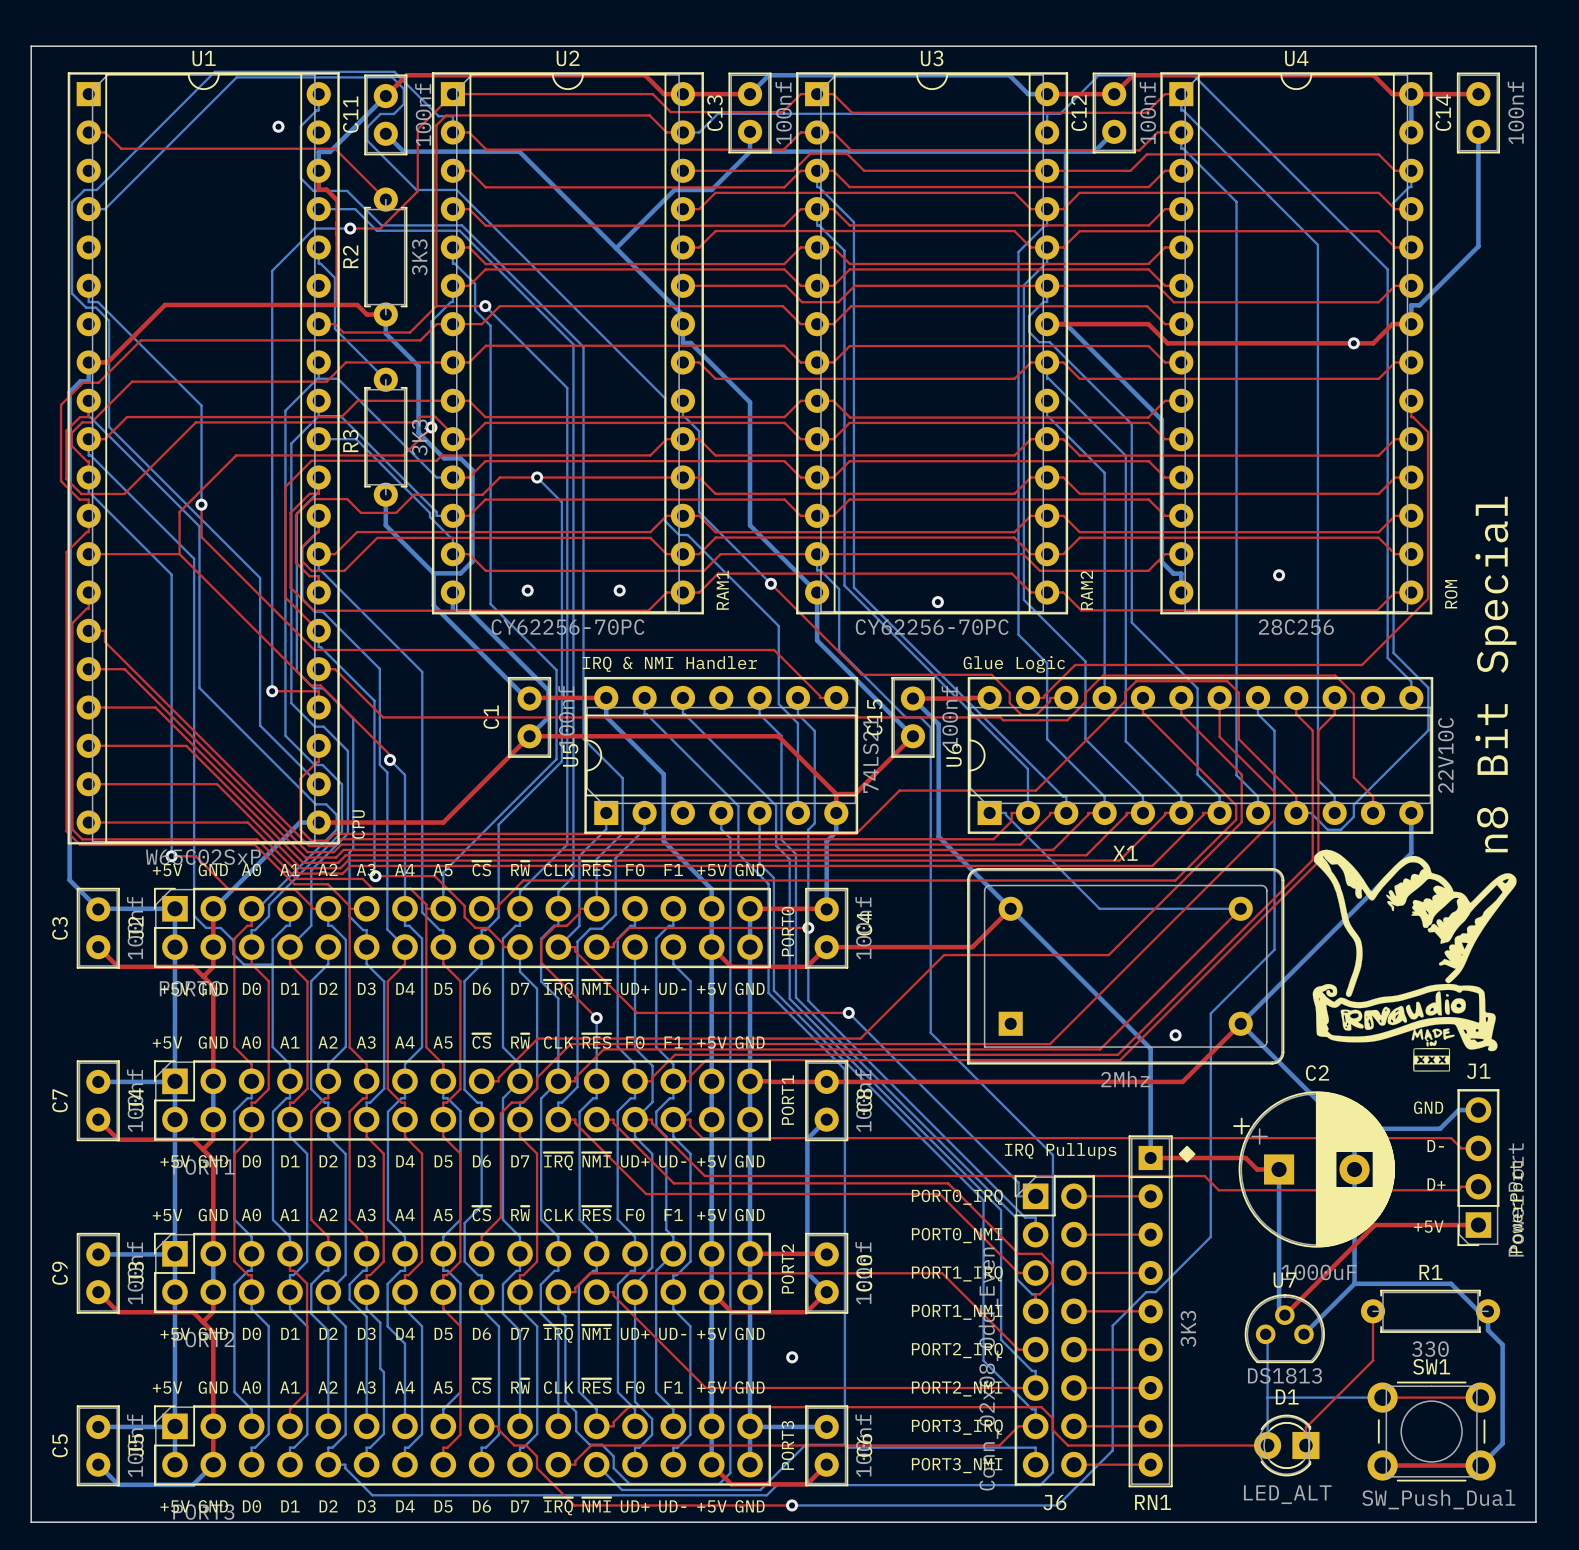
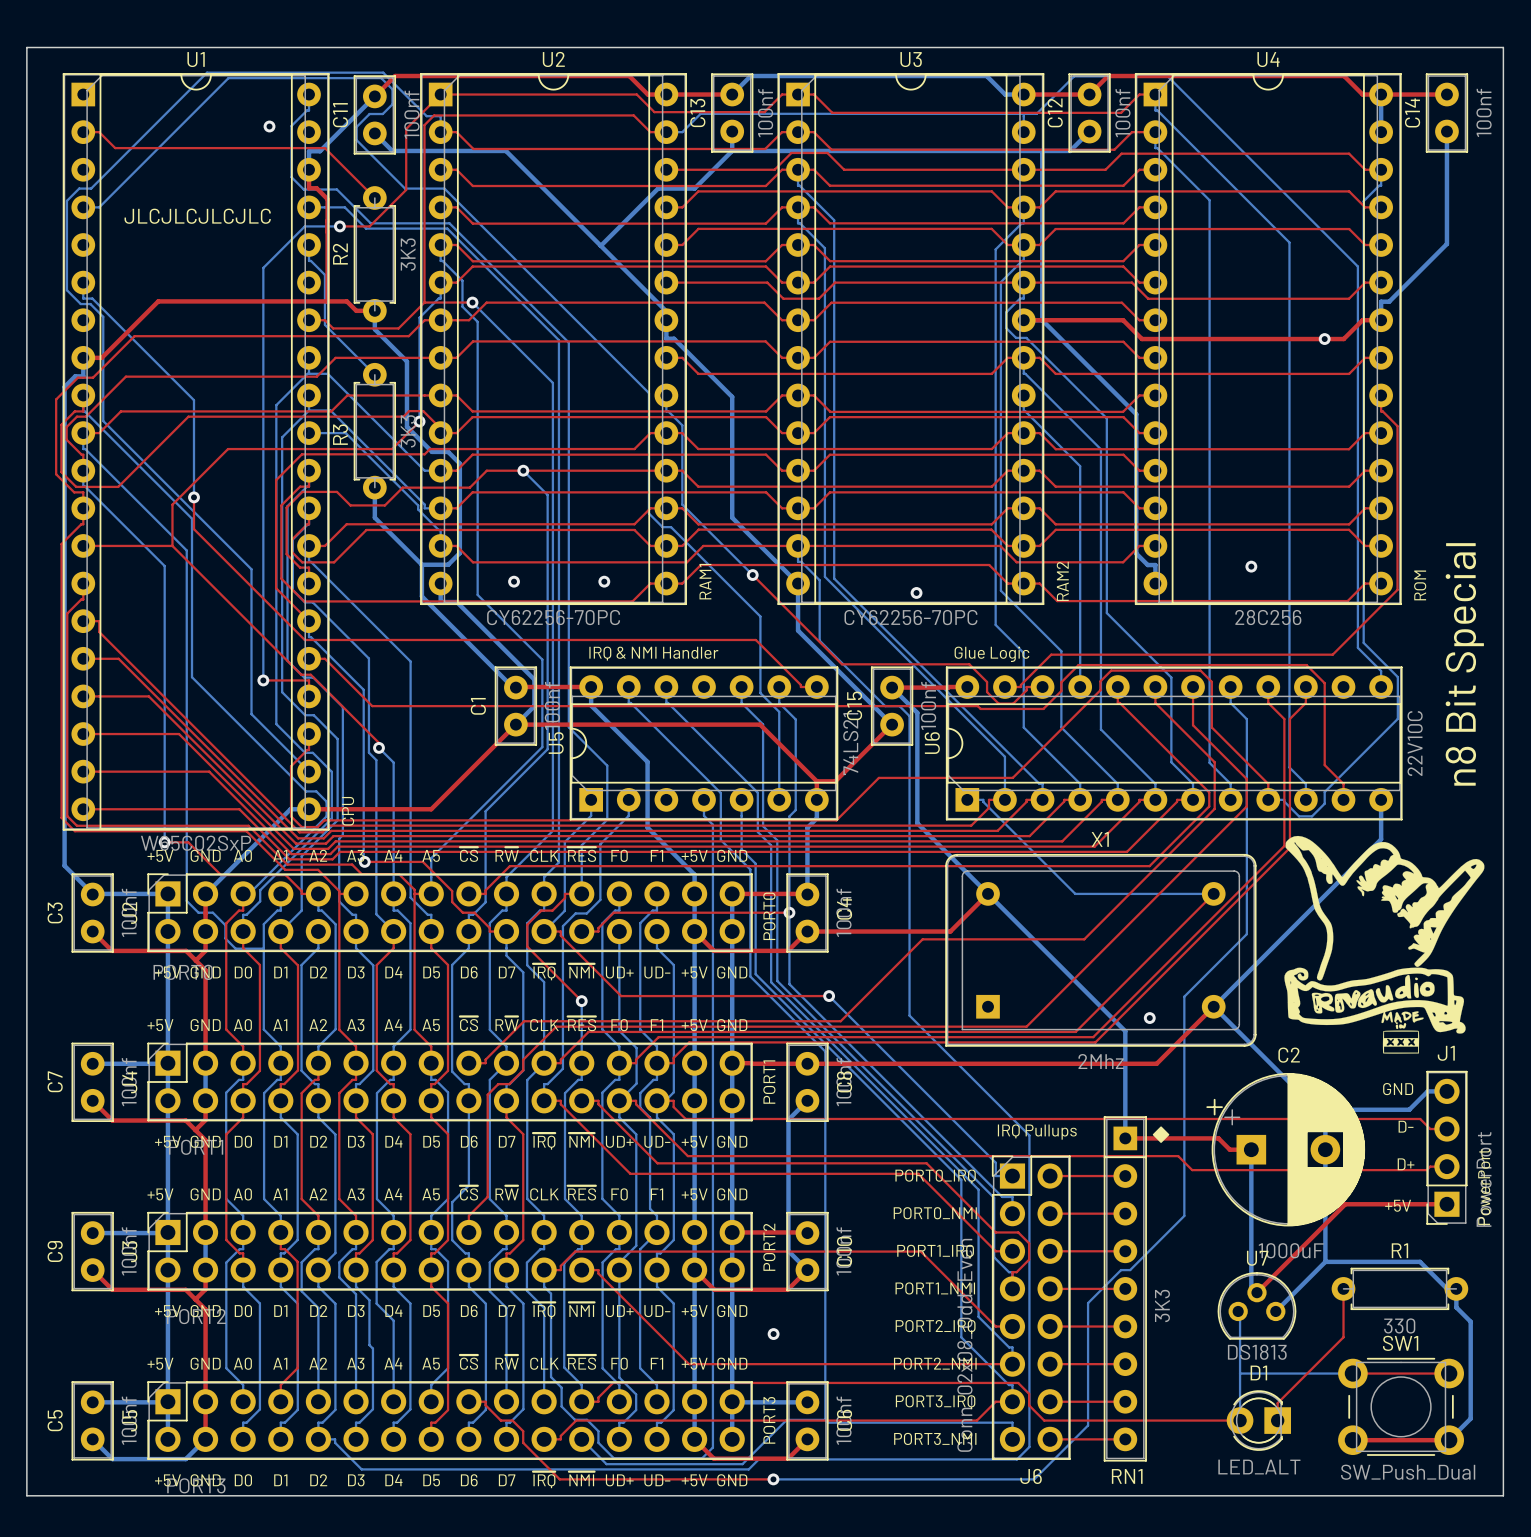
text: none -> JLCJLCJLCJLC (197, 216)

